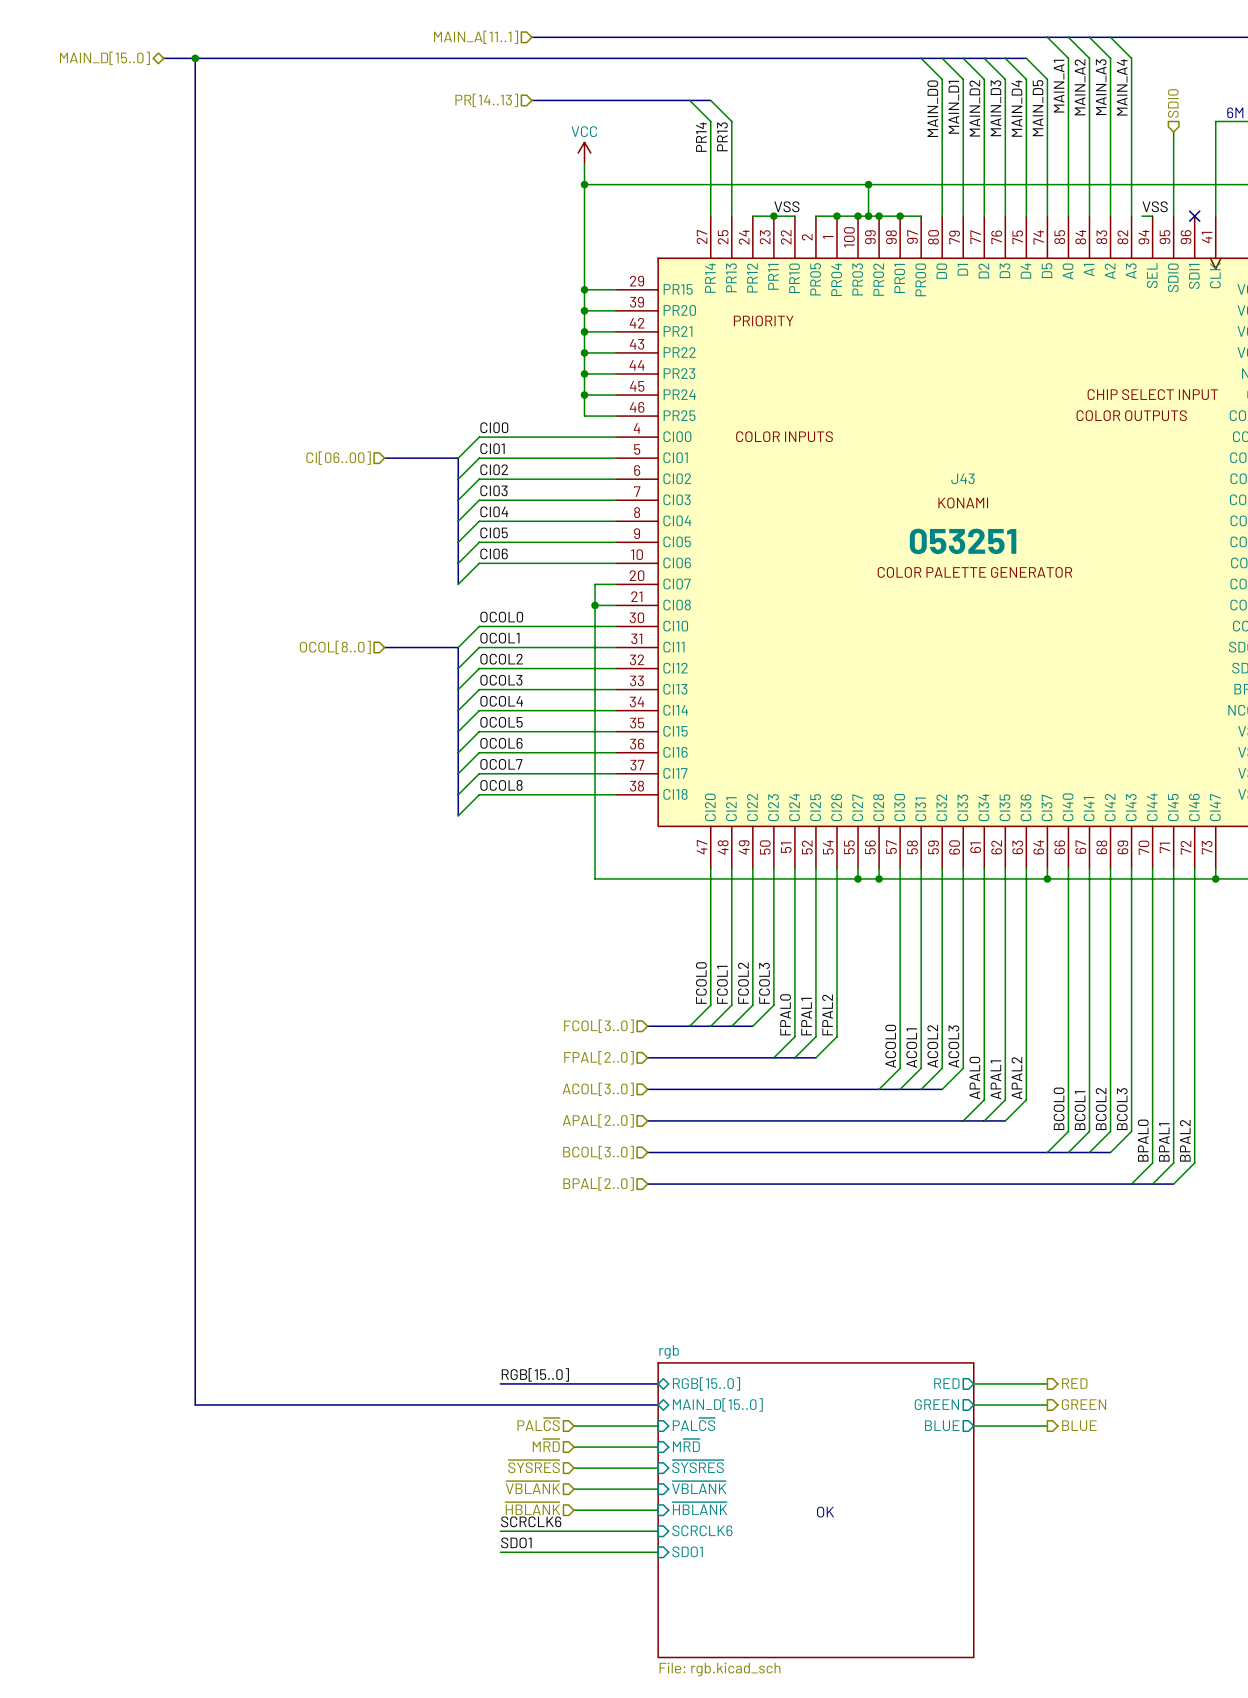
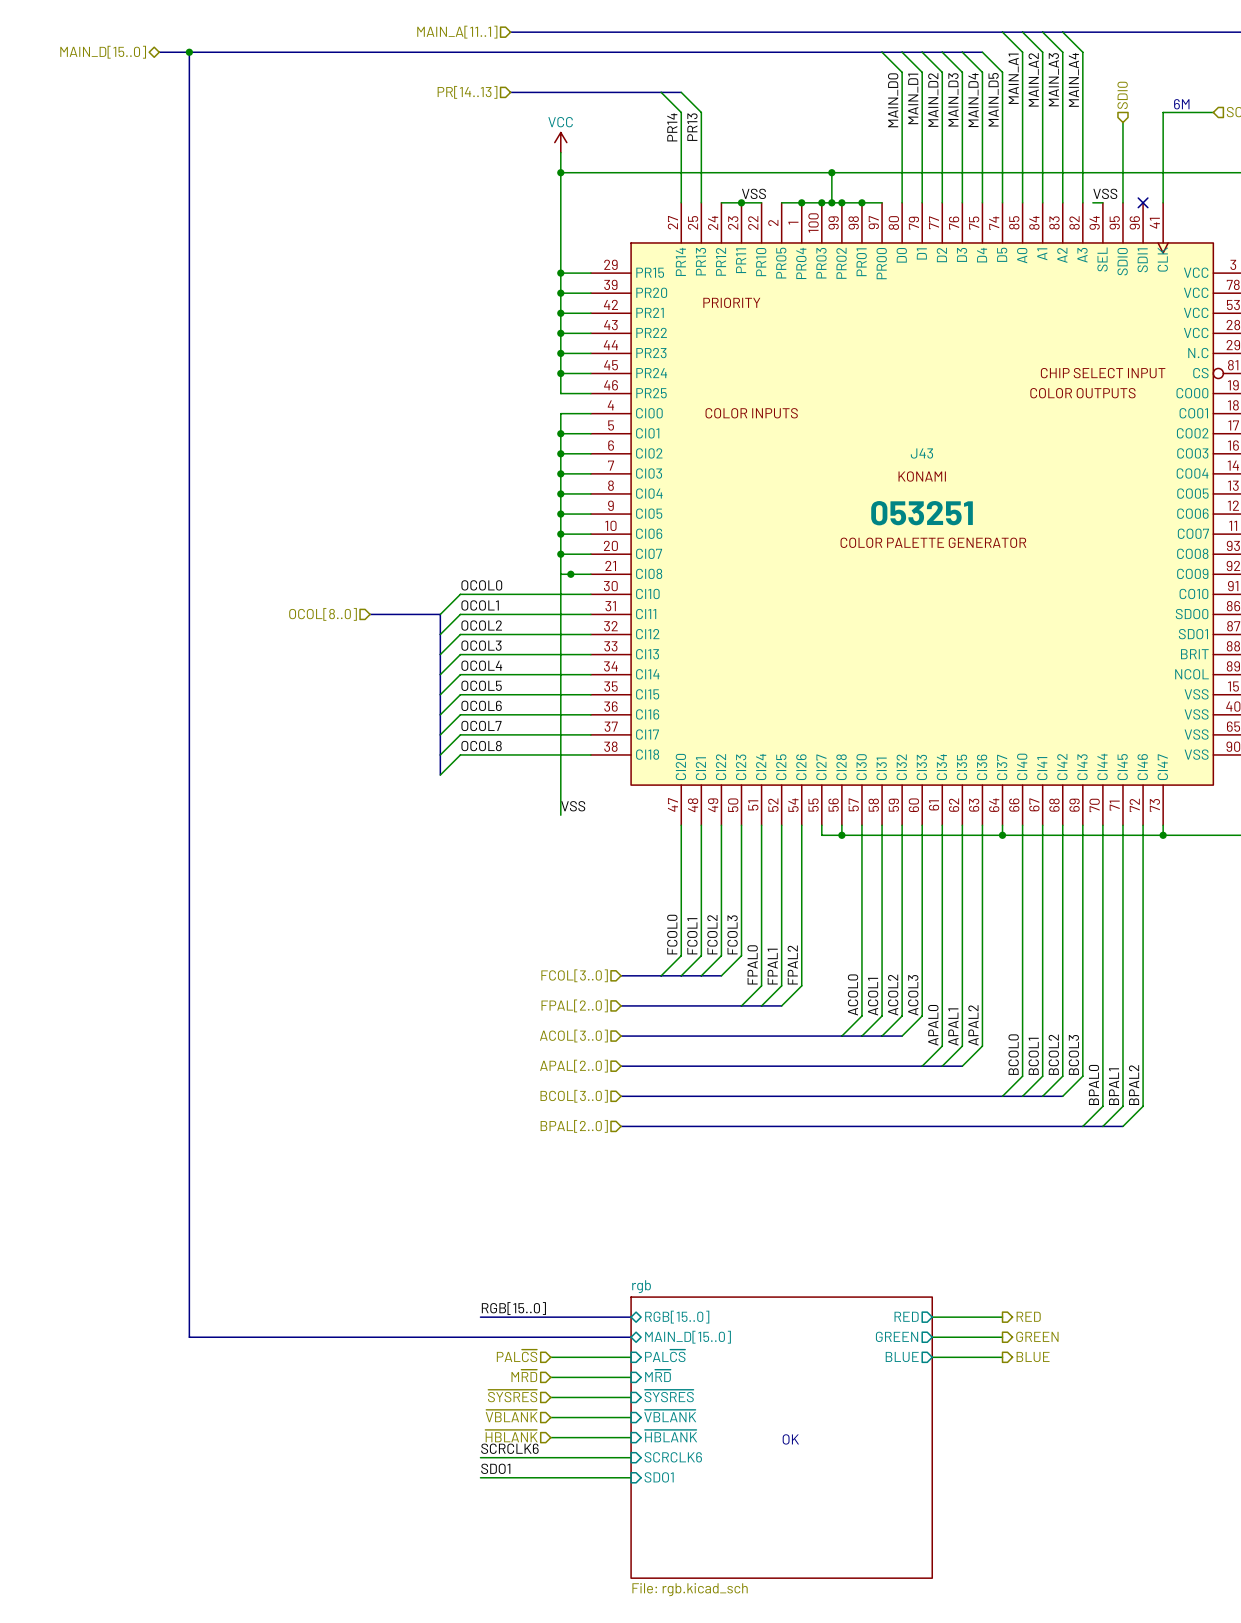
label: CI00 (494, 427) -> none
wire: (584, 437) (479, 437) (458, 458) -> (560, 413) (560, 815)
label: CI01 (492, 448) -> none
hierarchical label: CI[06..00] (338, 458) -> none
bus: (384, 458) (458, 458) (458, 584) -> none
wire: (584, 458) (479, 458) (458, 479) -> none
junction: none -> (560, 433)
label: CI02 (494, 469) -> none
wire: (584, 479) (479, 479) (458, 500) -> none
junction: none -> (560, 453)
label: CI03 (493, 490) -> none
wire: (584, 500) (479, 500) (458, 521) -> none
junction: none -> (560, 473)
label: CI04 (494, 511) -> none
wire: (584, 521) (479, 521) (458, 542) -> none
junction: none -> (560, 493)
label: CI05 (494, 532) -> none
wire: (584, 542) (479, 542) (458, 563) -> none
junction: none -> (560, 514)
label: CI06 (494, 553) -> none
wire: (584, 563) (479, 563) (458, 584) -> none
junction: none -> (560, 534)
junction: none -> (560, 554)
wire: (595, 584) (595, 878) (858, 878) -> (570, 554) (560, 554)
wire: none -> (560, 574) (570, 574)
label: none -> VSS (573, 806)
junction: (858, 878) -> none

